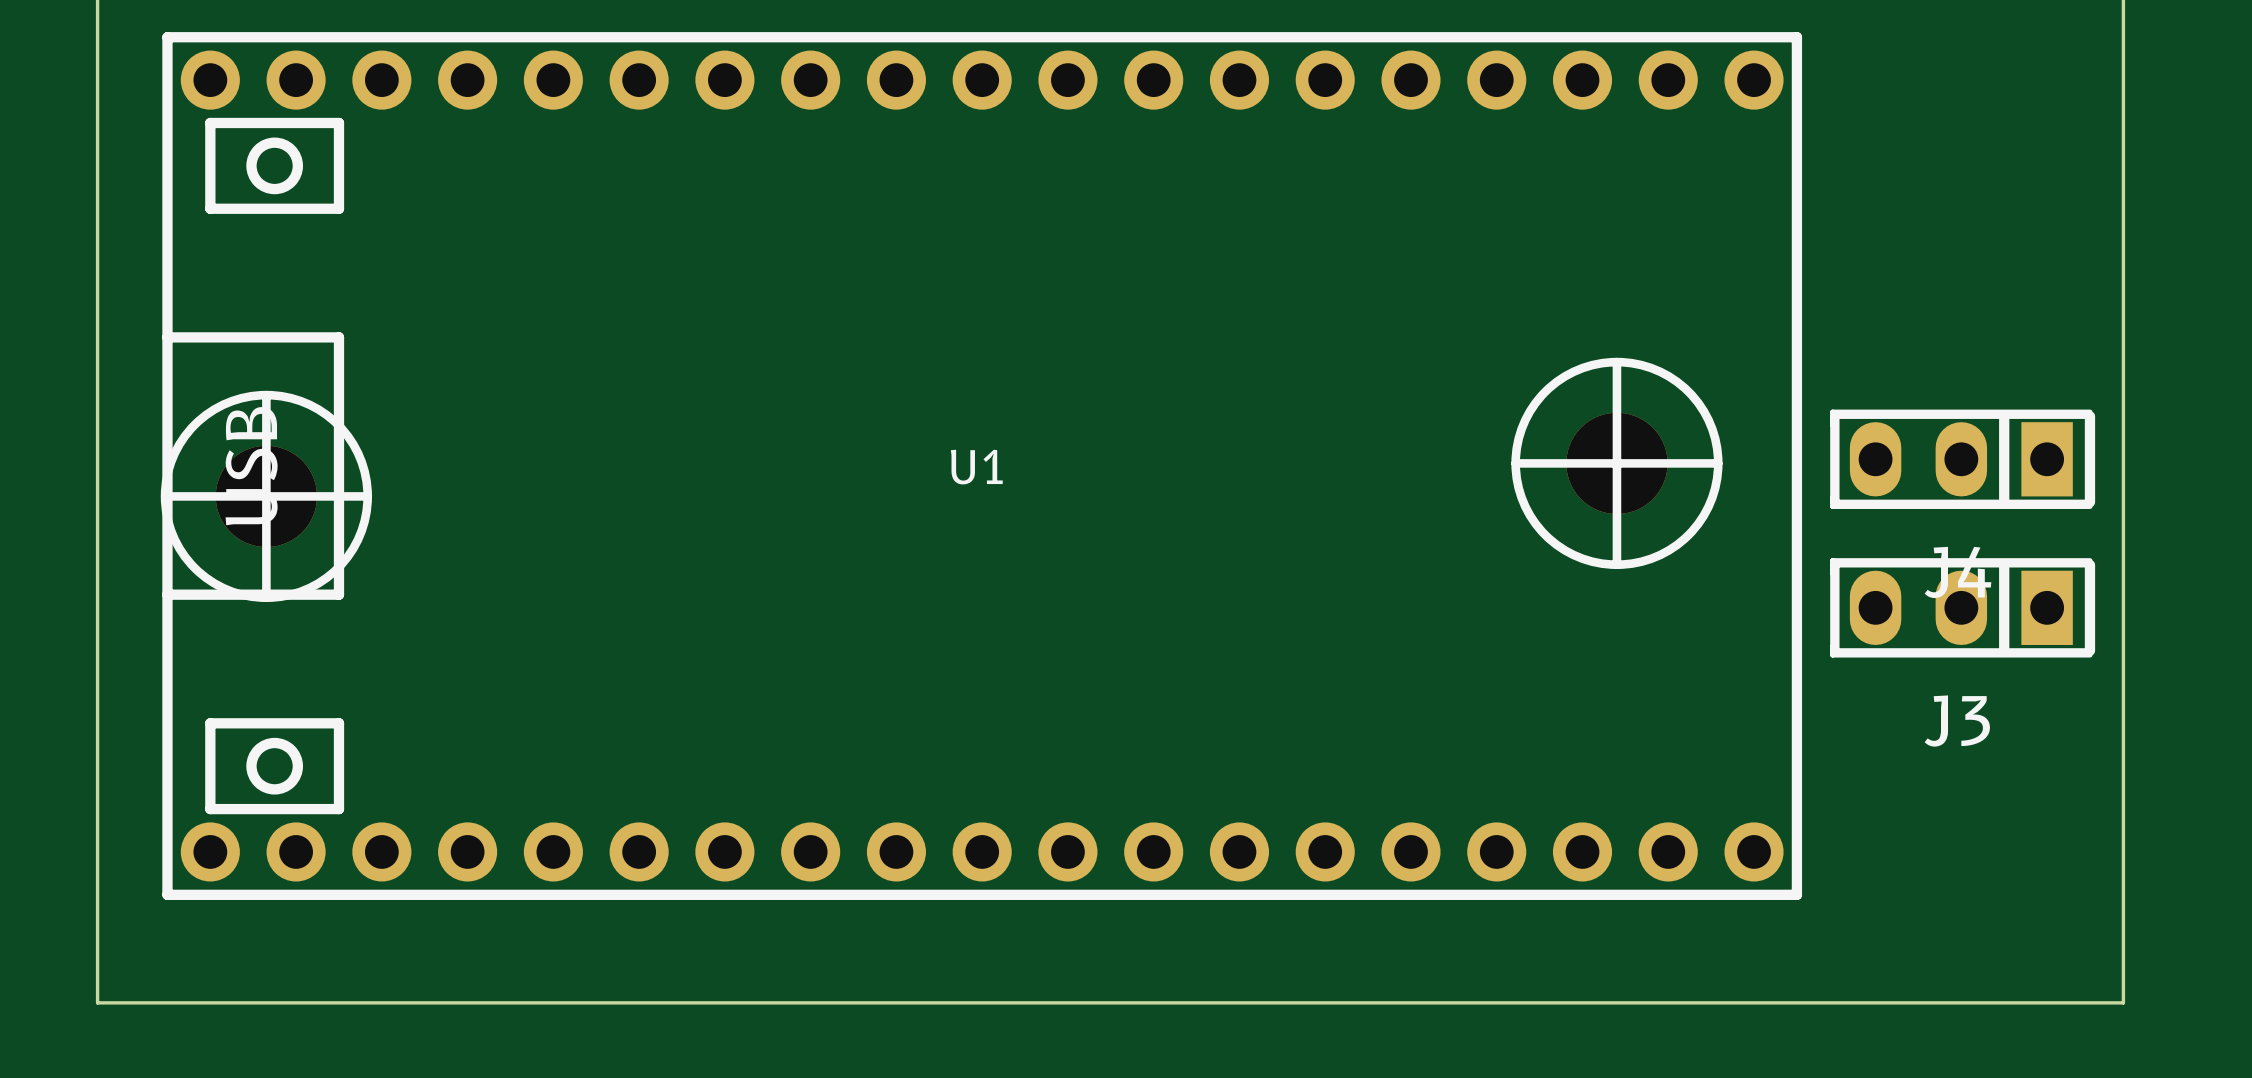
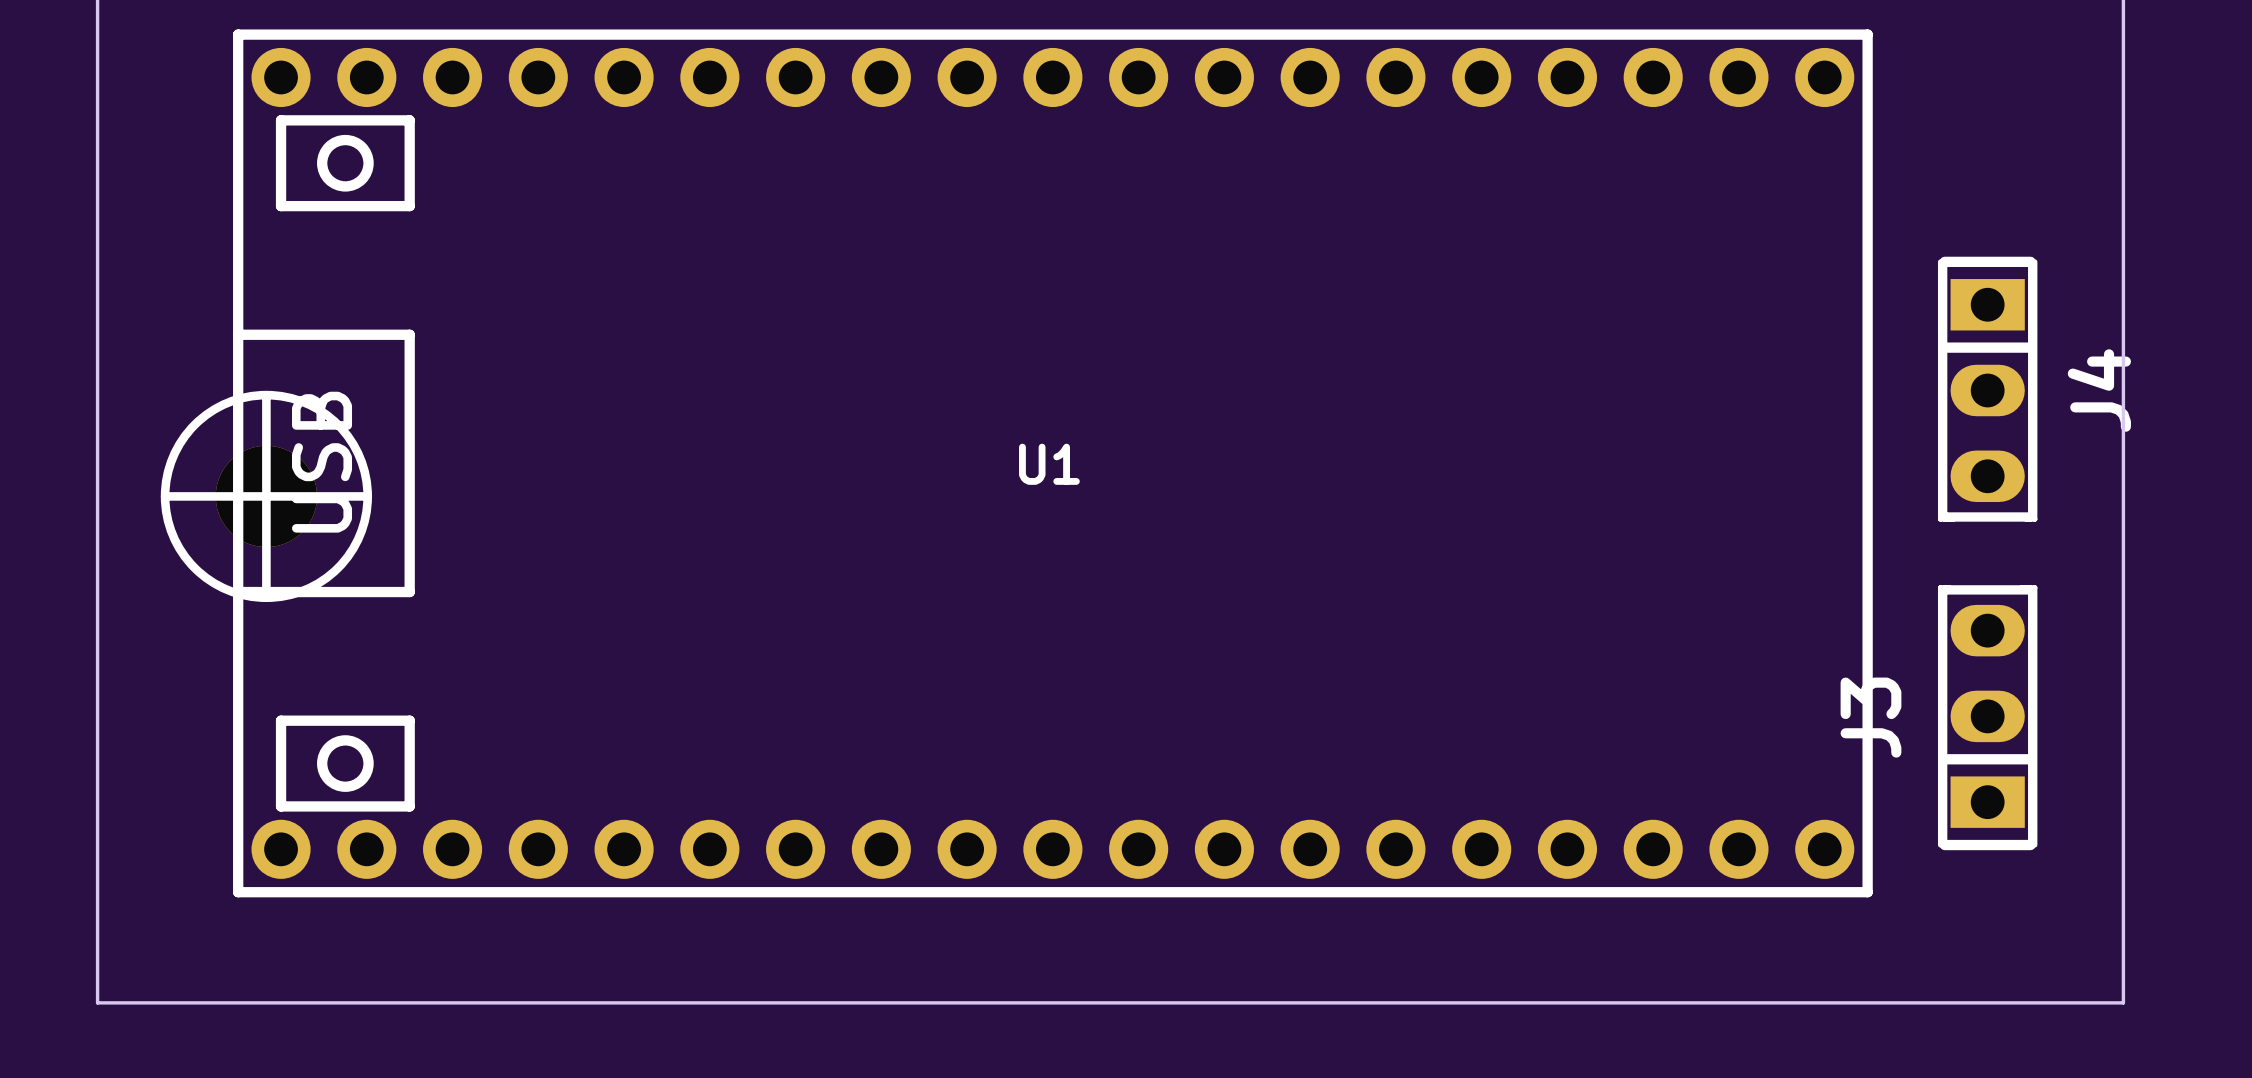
J4 rotation: 0° (1962, 459) -> 90° counterclockwise (1987, 389)
part: (1616, 463) -> none
U1 position: (982, 466) -> (1052, 463)
J3 rotation: 0° (1962, 607) -> 90° clockwise (1987, 717)

